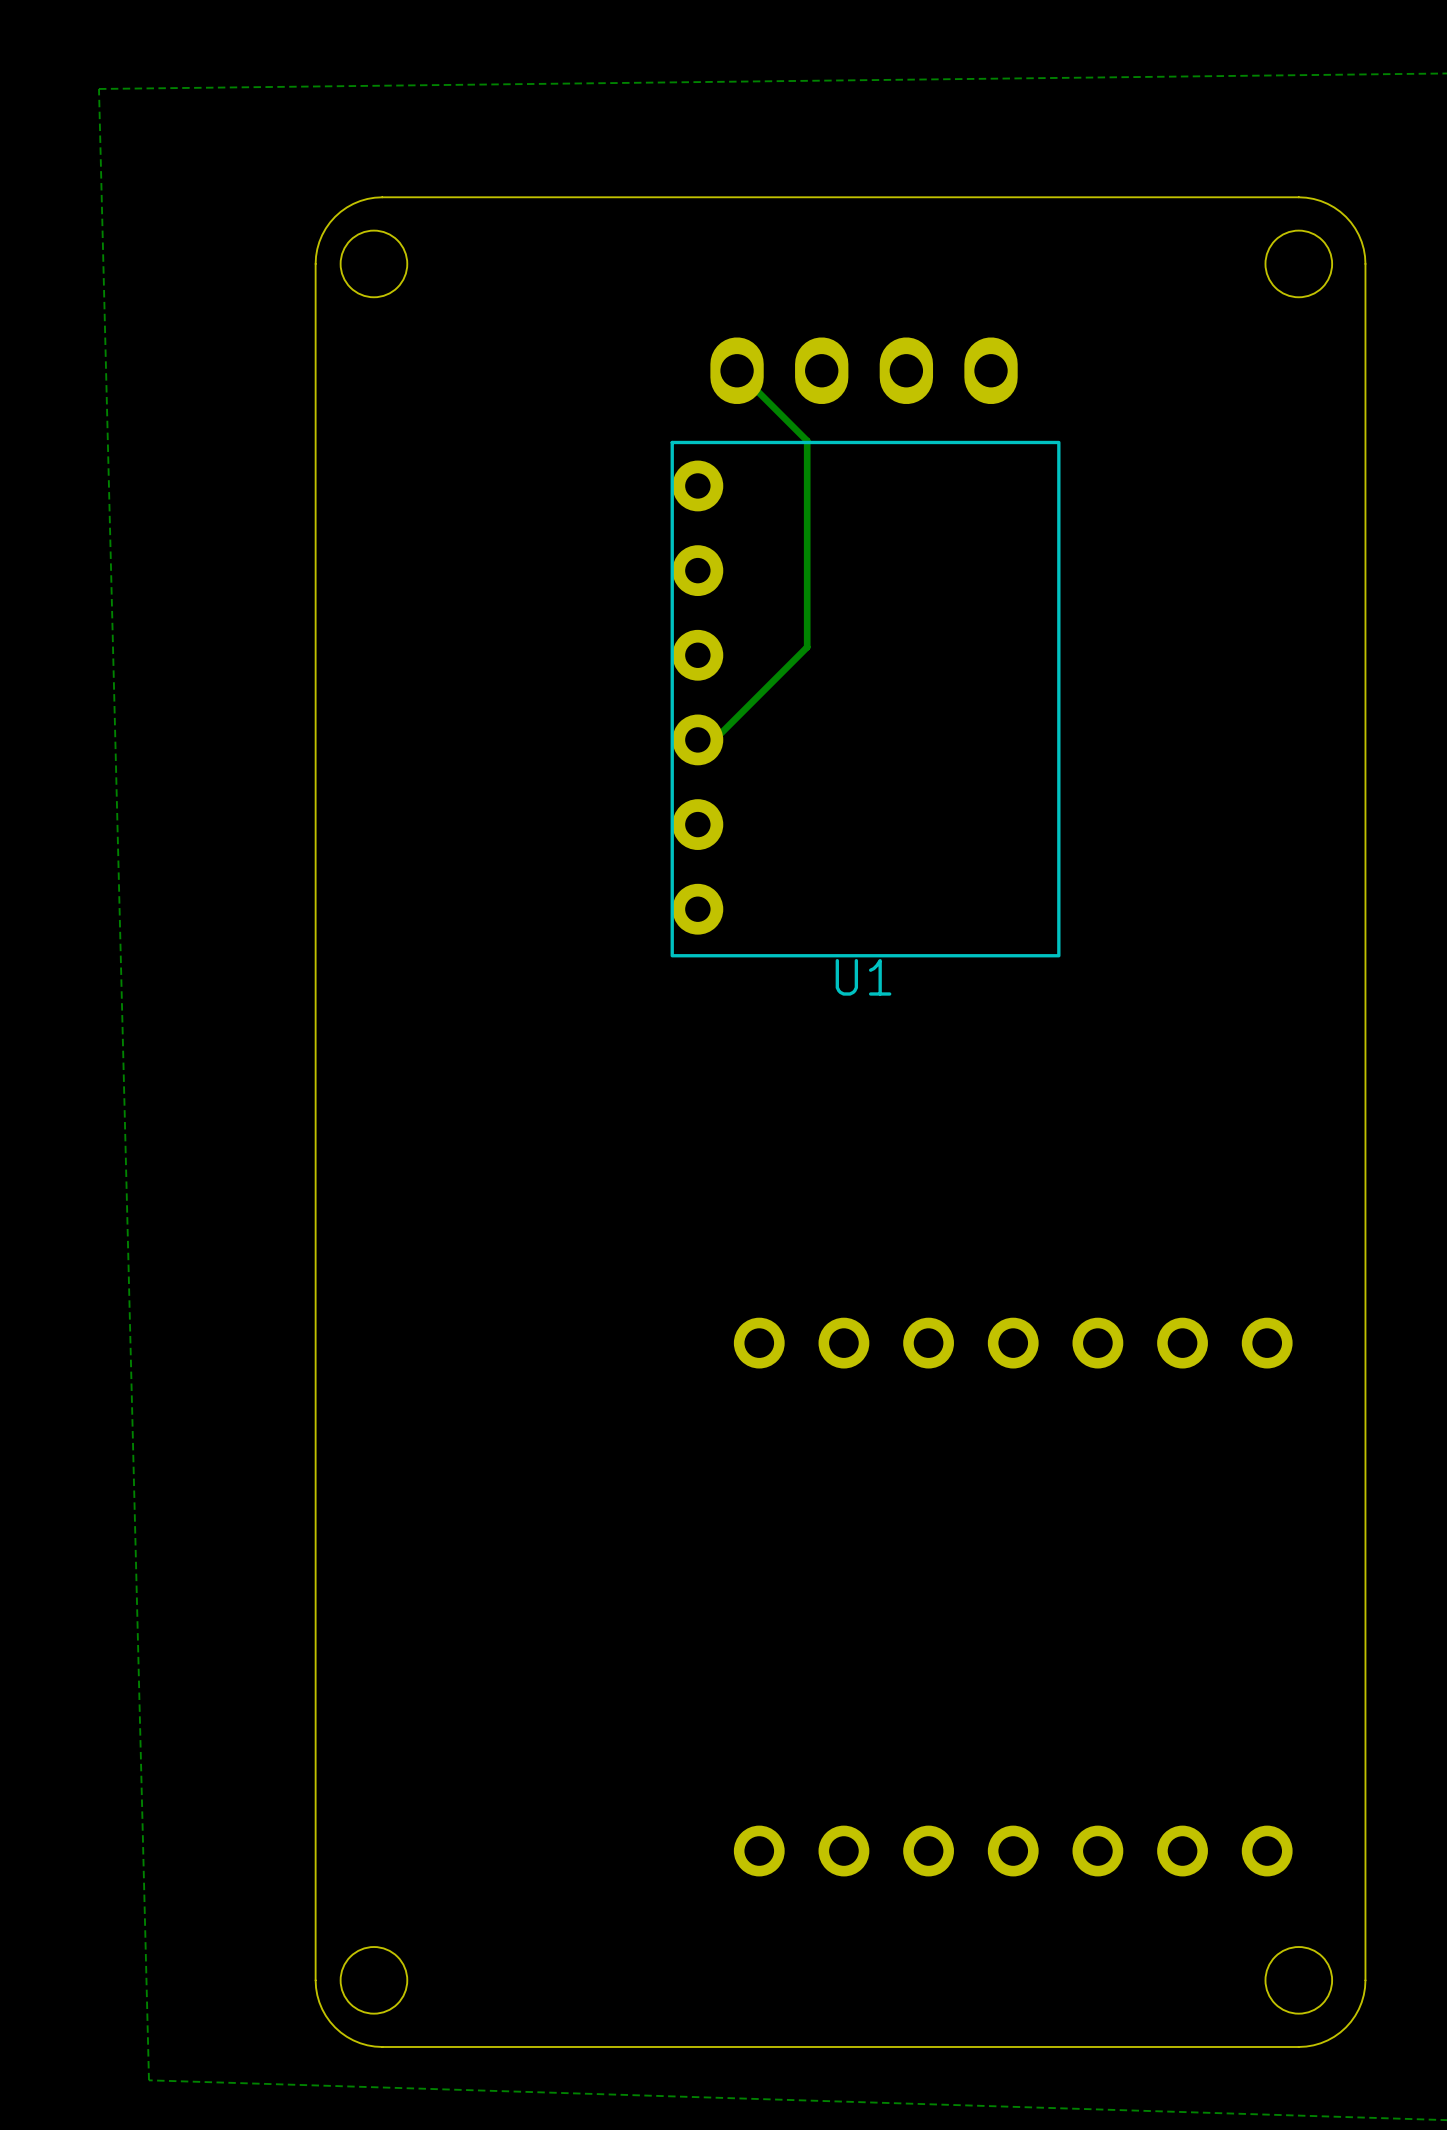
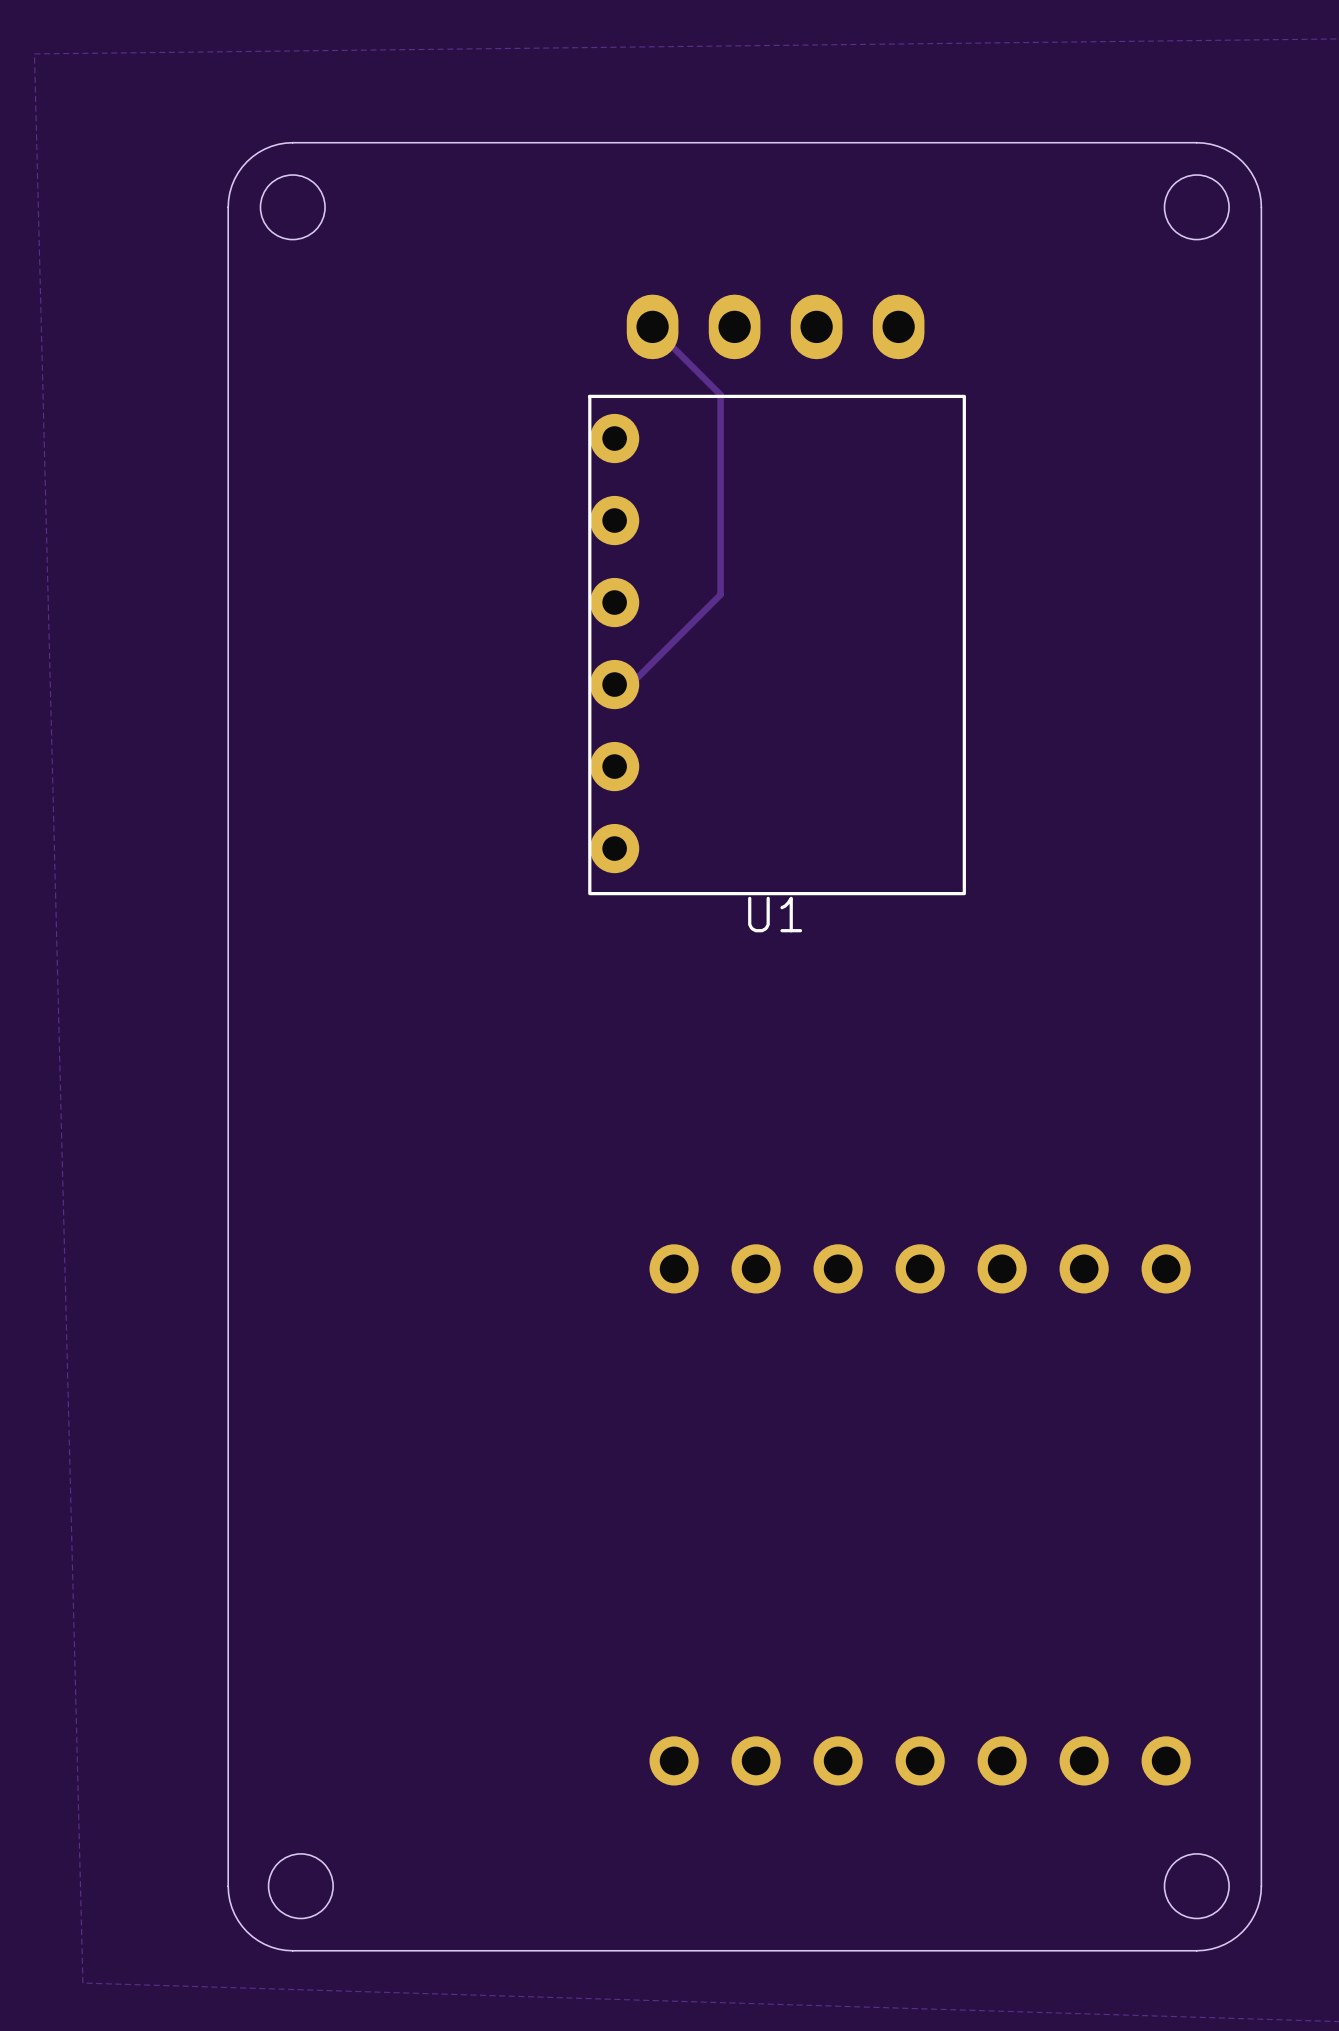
round board edge position: (373, 263) -> (292, 207)
round board edge position: (1298, 263) -> (1196, 207)
board edge: (1365, 263) (1361, 241) (1355, 228) (1345, 216) (1327, 203) (1313, 198) (1298, 197) (382, 197) (367, 198) (346, 207) (330, 222) (322, 235) (317, 249) (315, 263) (315, 1980) (317, 1995) (322, 2009) (335, 2027) (346, 2036) (360, 2043) (382, 2046) -> (1261, 223) (1259, 192) (1254, 179) (1247, 167) (1237, 156) (1224, 149) (1211, 144) (1196, 142) (292, 142) (271, 146) (258, 152) (242, 167) (234, 179) (229, 192) (228, 207) (228, 1886) (229, 1900) (234, 1914) (242, 1926) (252, 1936) (264, 1944) (278, 1949) (308, 1950)

